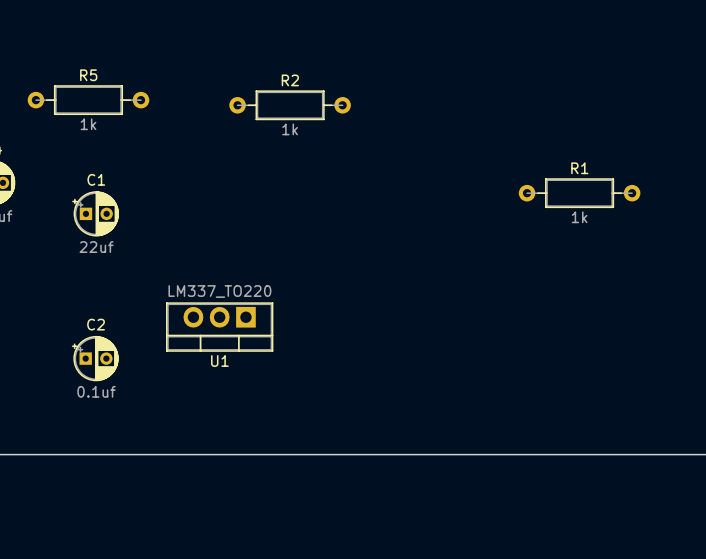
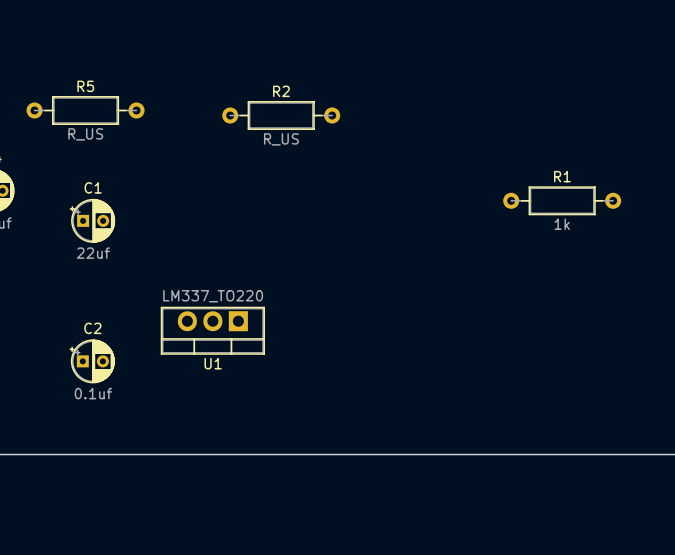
R5 value: 1k (88, 124) -> R_US (85, 134)
R2 value: 1k (290, 129) -> R_US (281, 139)

